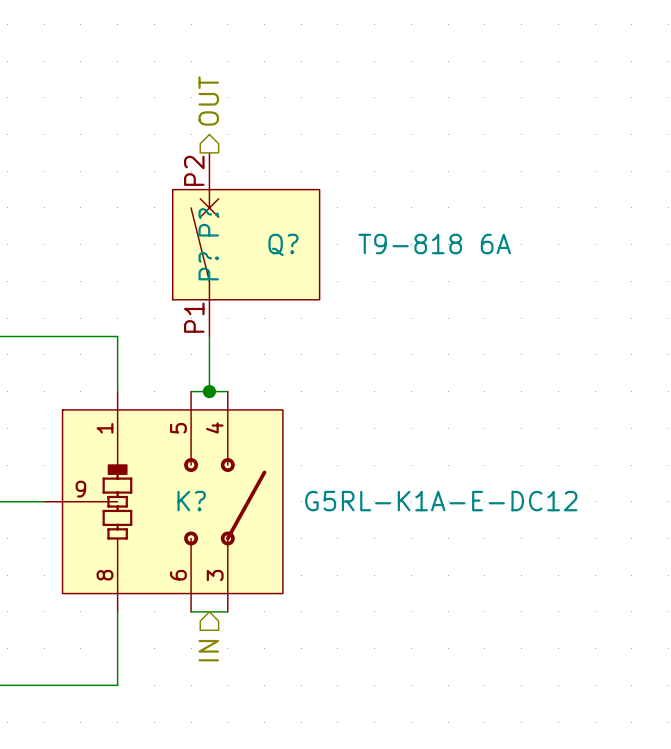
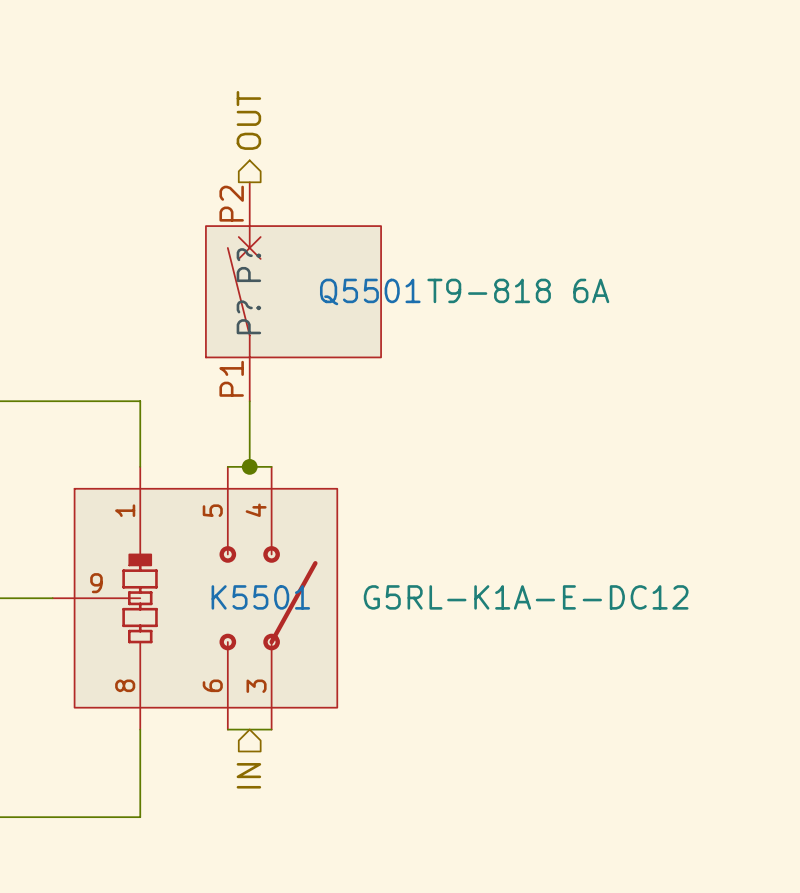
Q? name: Q? (283, 244) -> Q5501 (370, 291)
K? name: K? (191, 501) -> K5501 (260, 597)

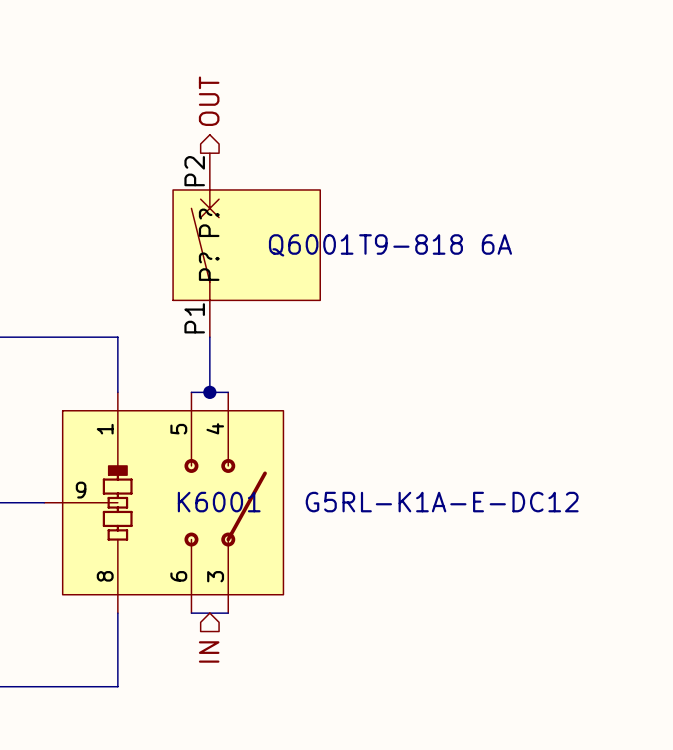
Q5501 name: Q5501 (370, 291) -> Q6001 (311, 245)
K5501 name: K5501 (260, 597) -> K6001 (219, 502)

